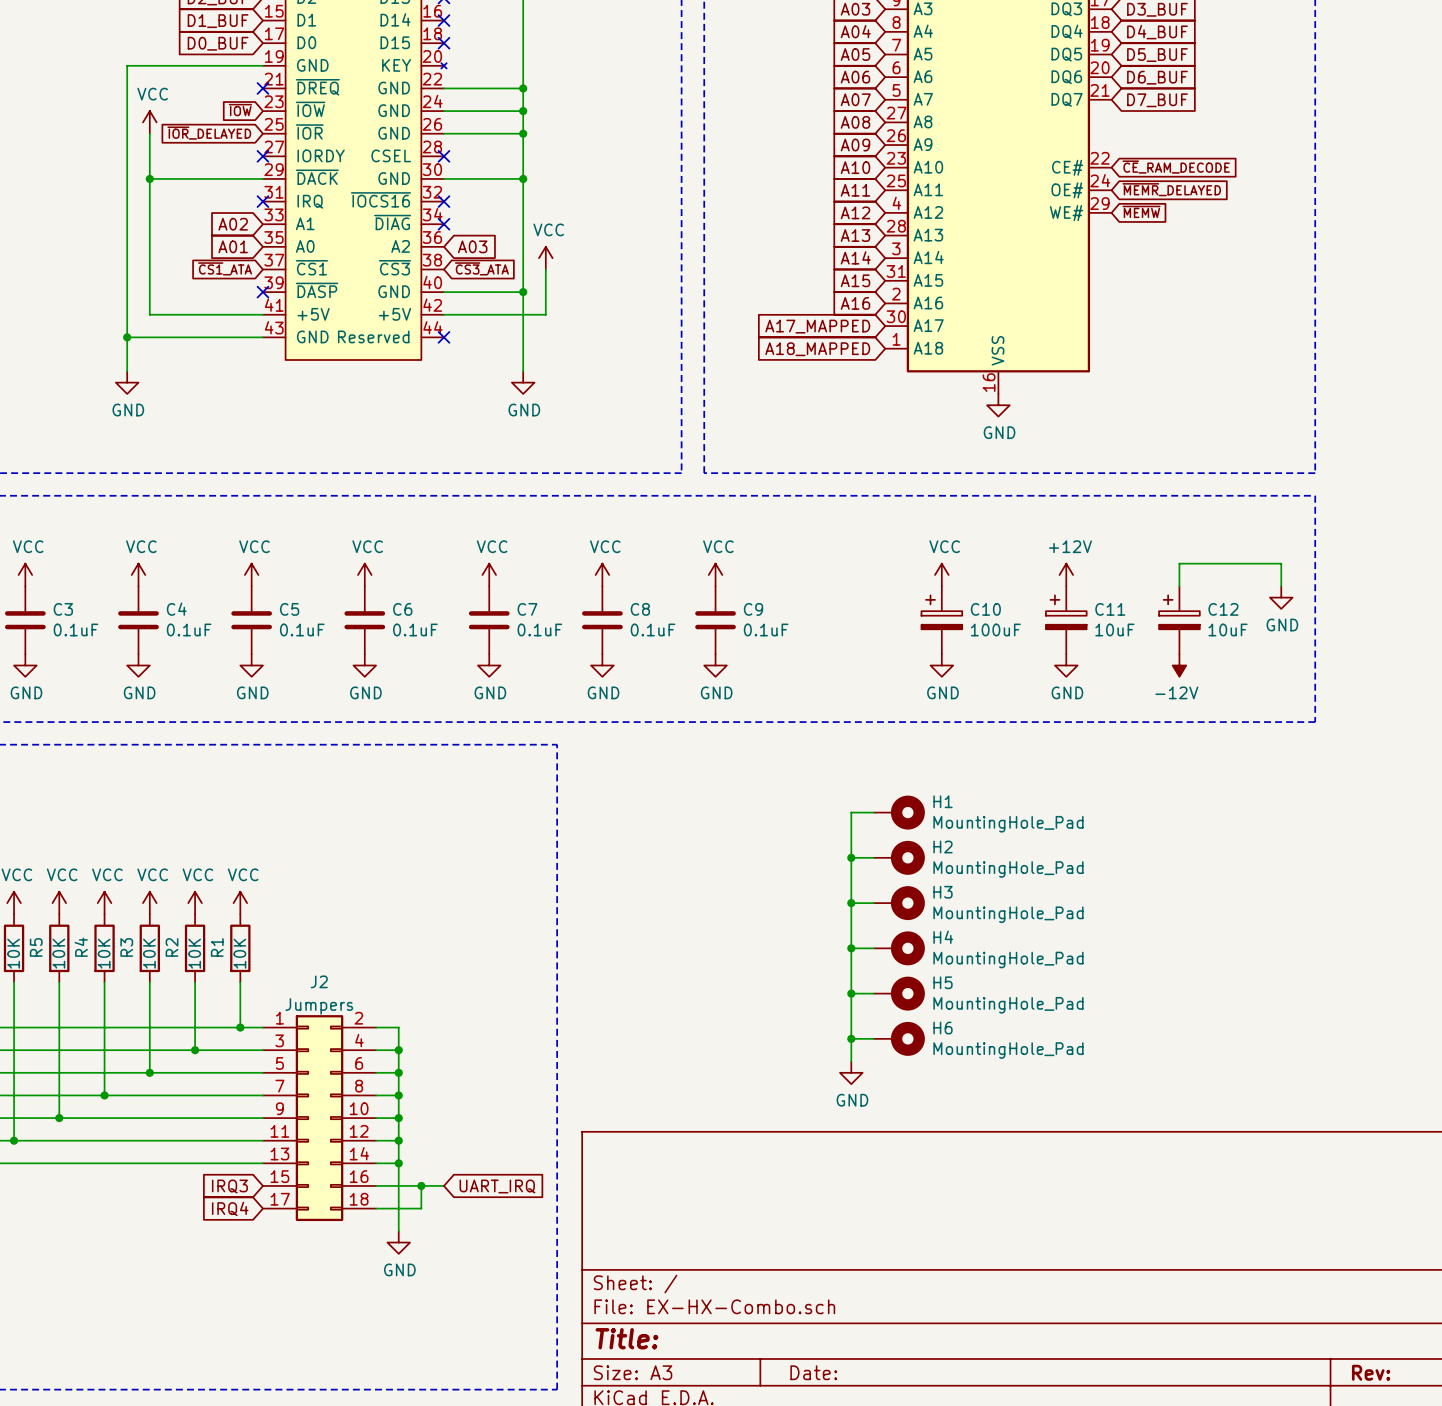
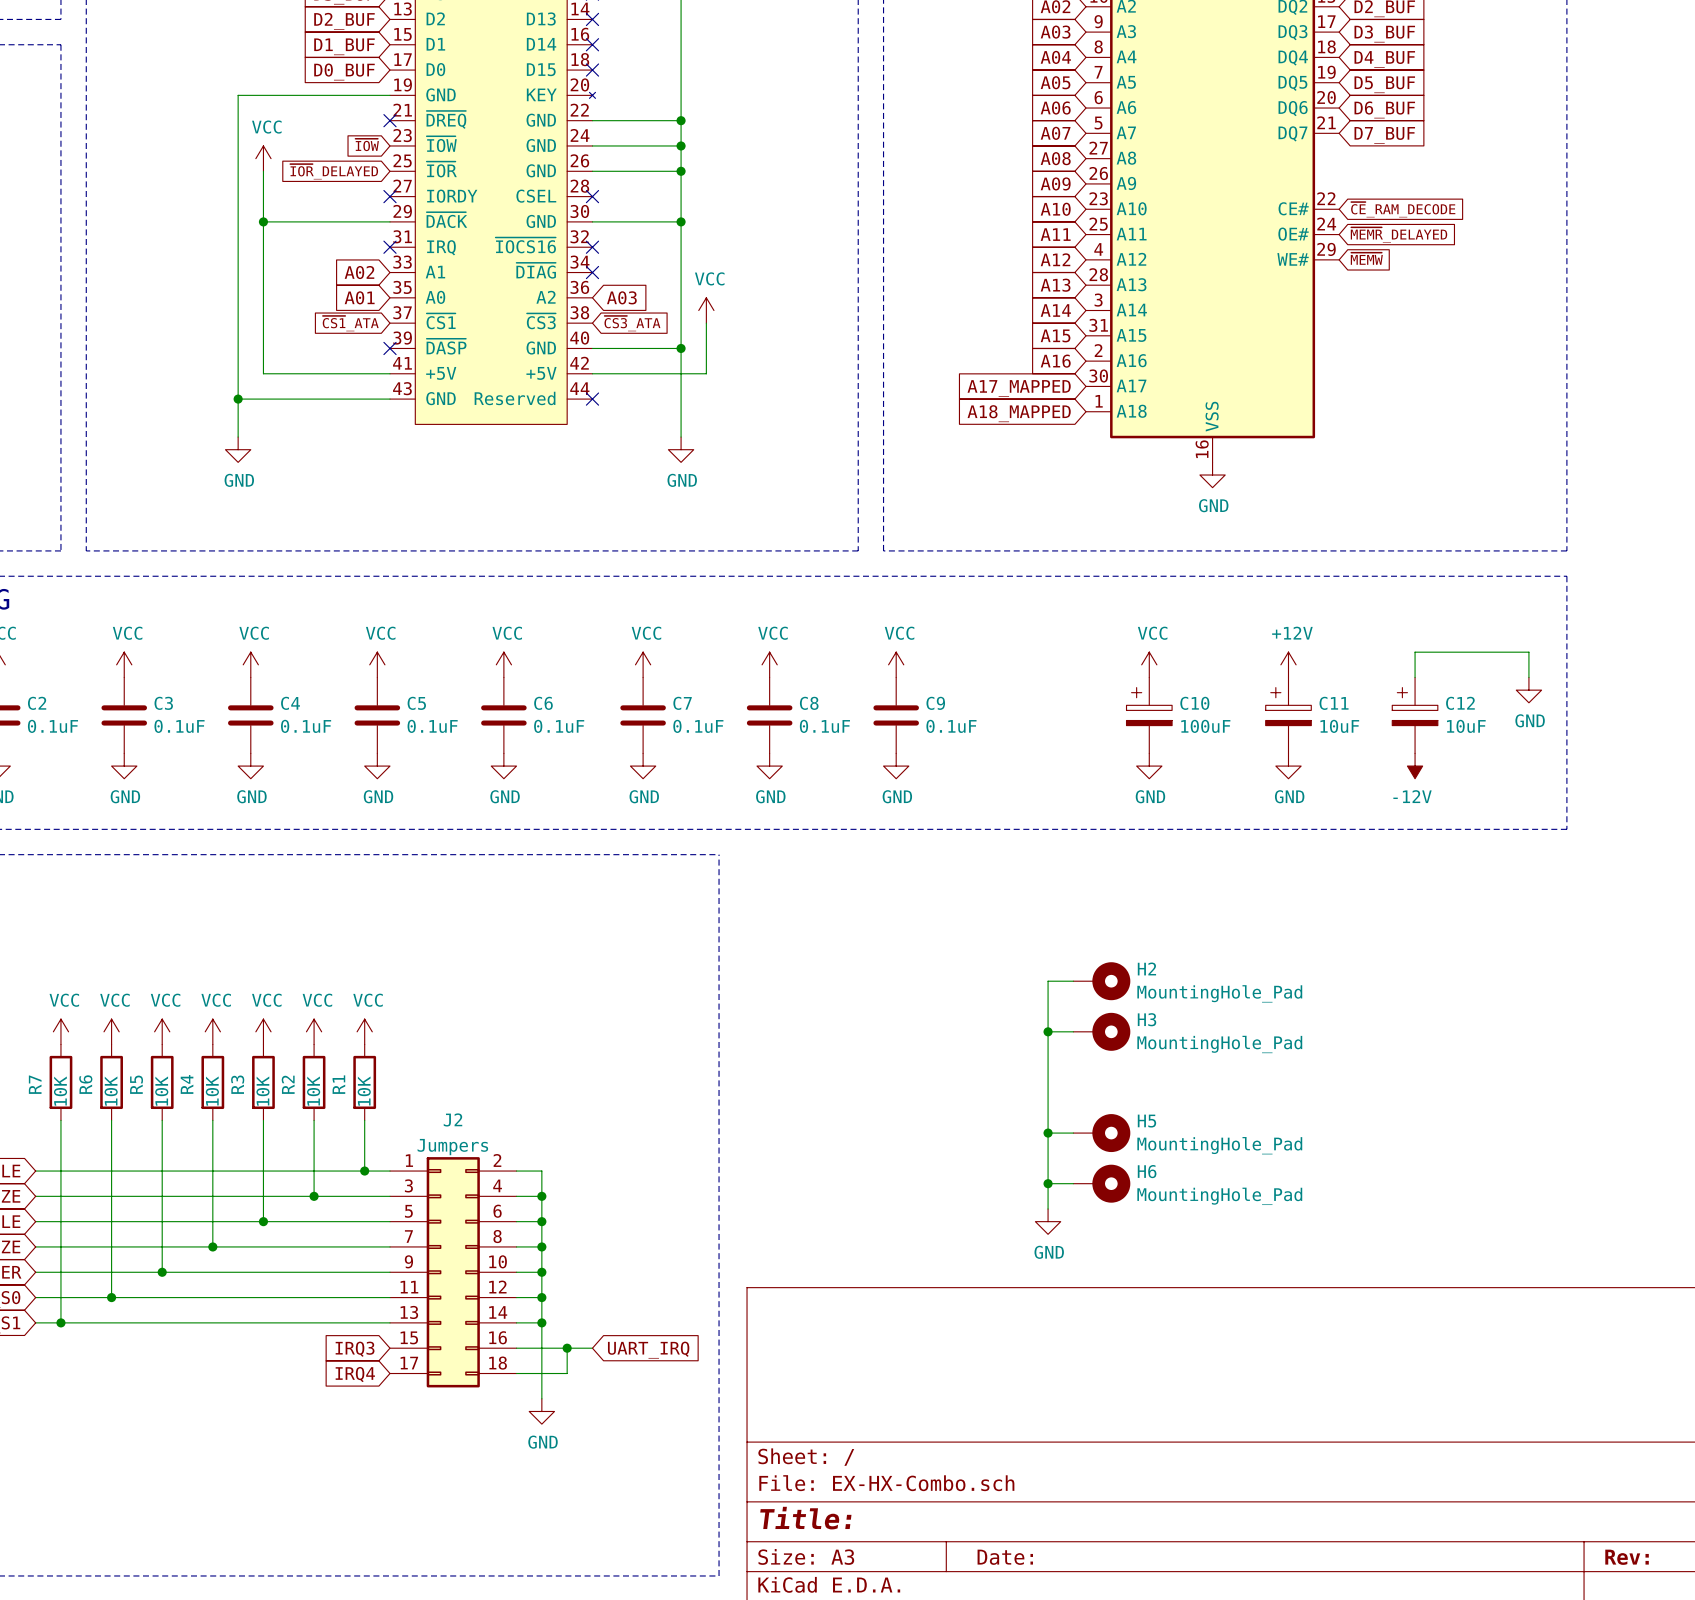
wire: (873, 812) (851, 812) (851, 857) -> none
H1: MountingHole_Pad (899, 812) -> none
junction: (851, 857) -> none
wire: (851, 948) (873, 948) -> none
junction: (851, 948) -> none
H4: MountingHole_Pad (899, 948) -> none

